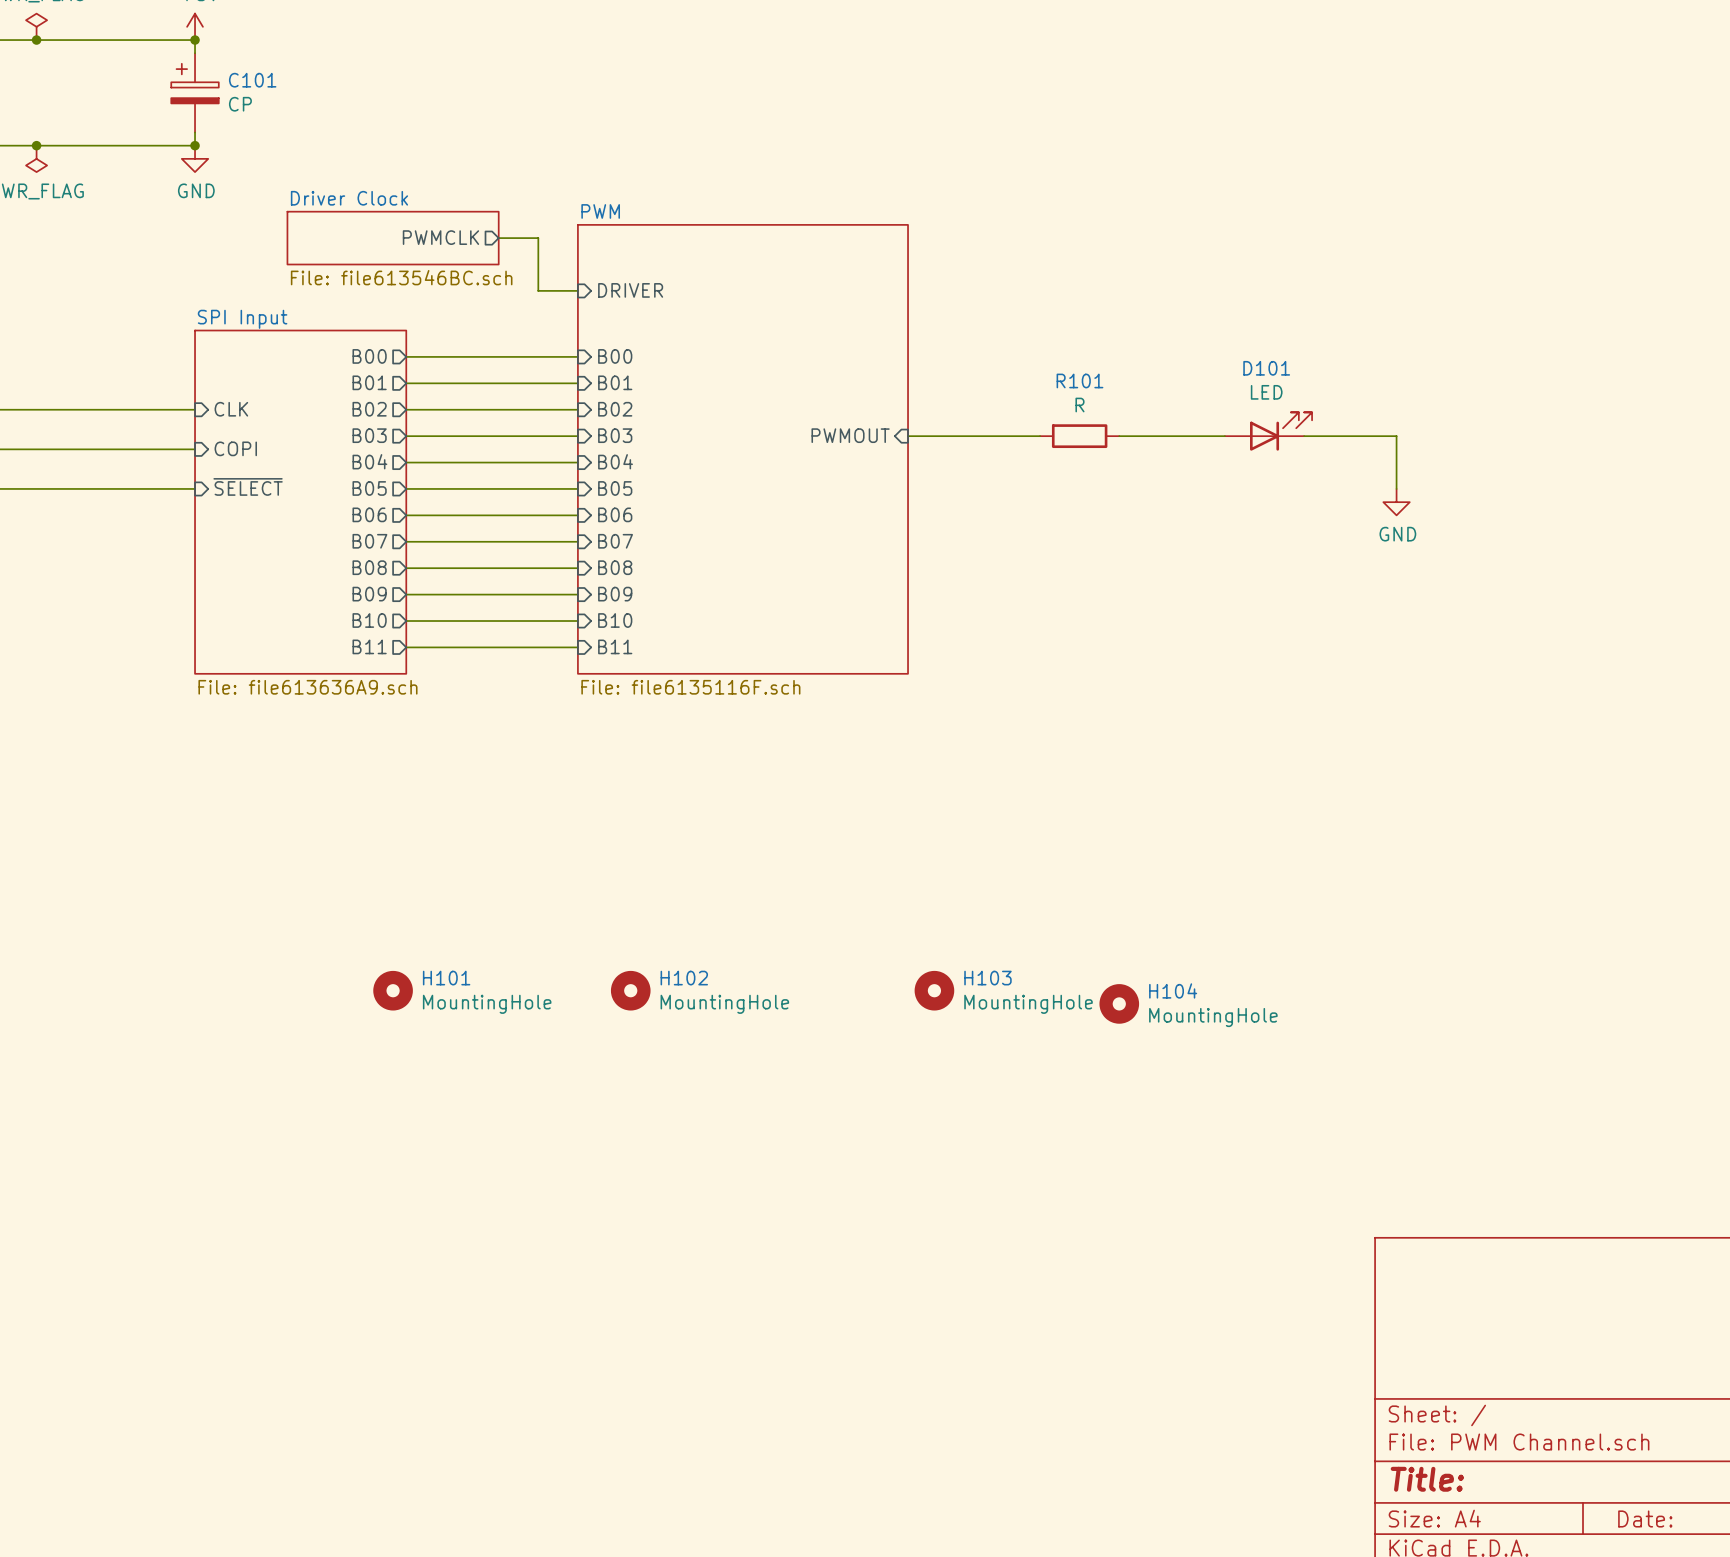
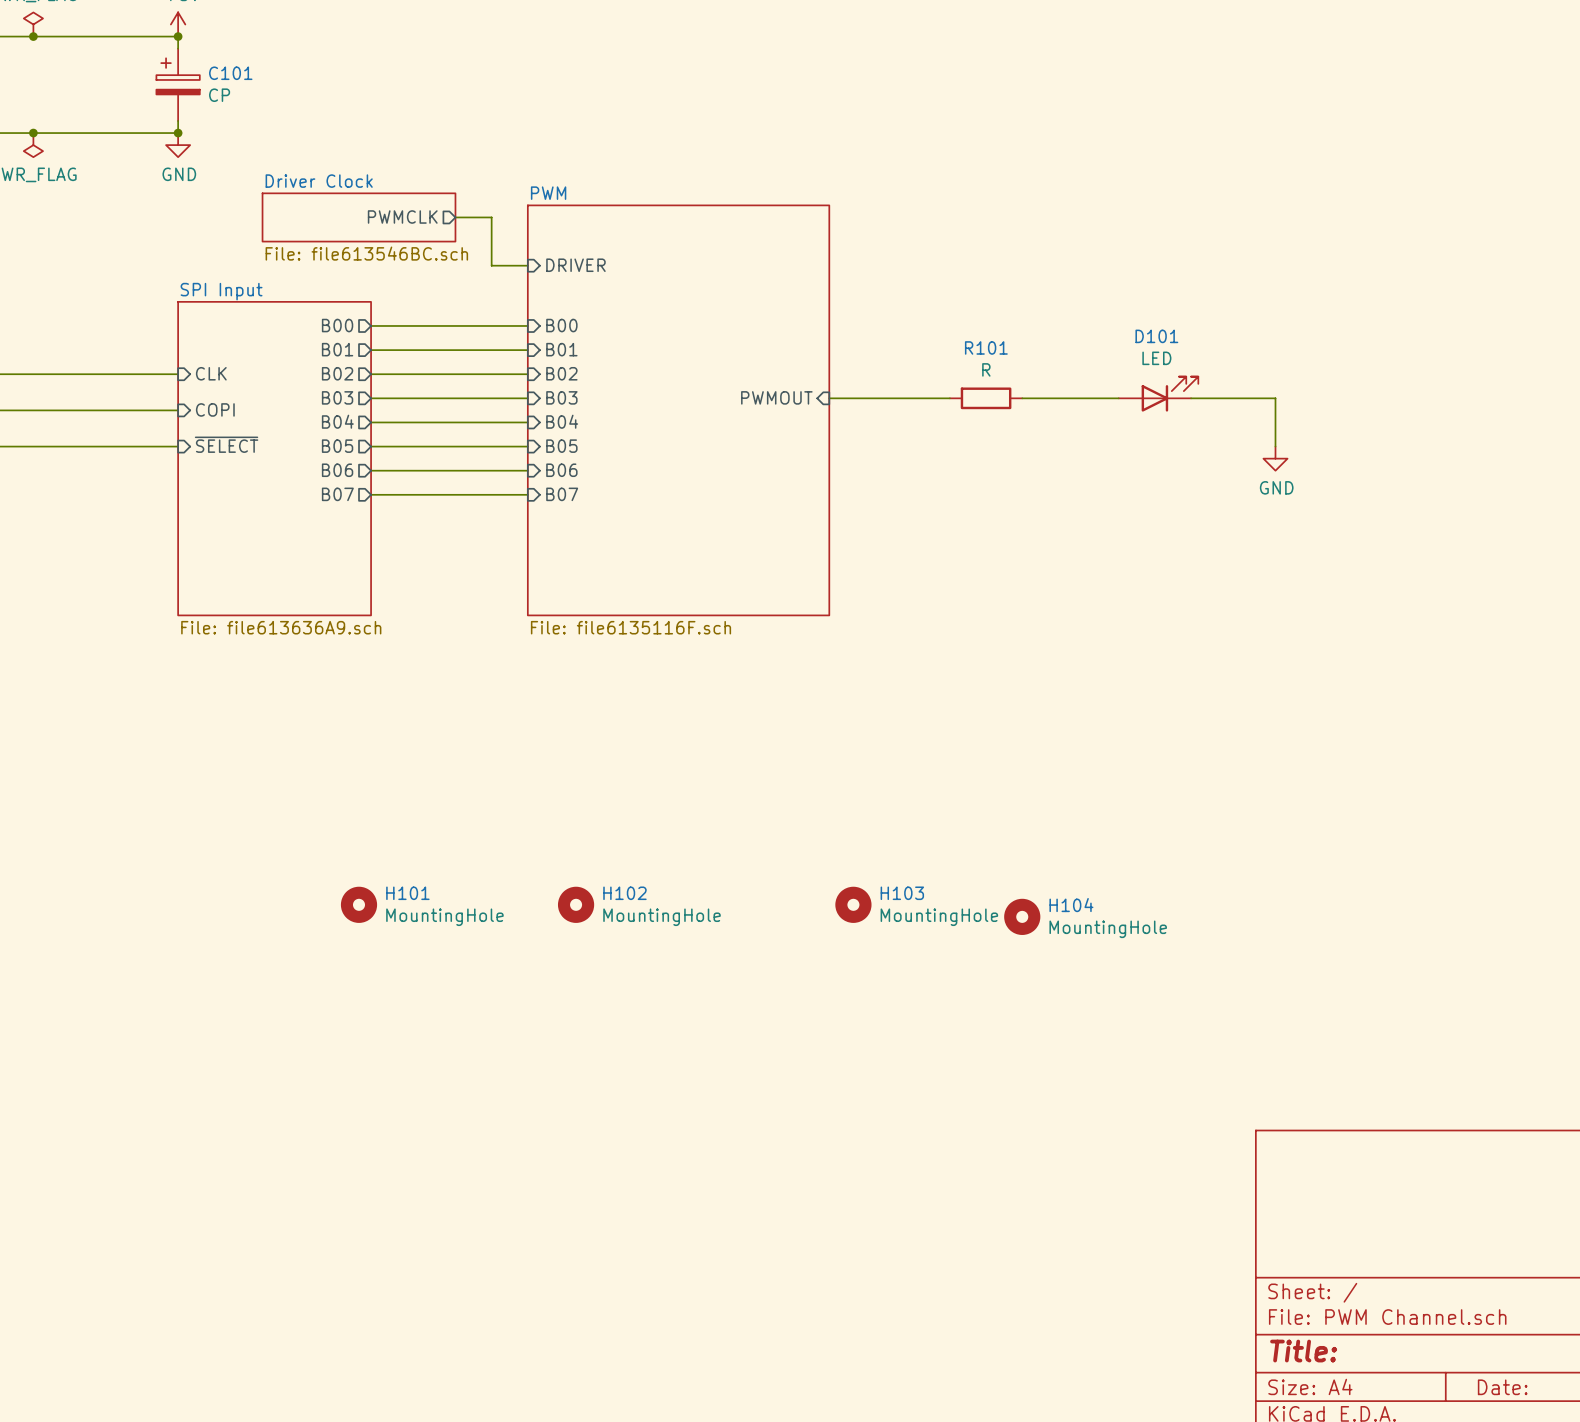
sheet pin: B08 (369, 567) -> none
sheet pin: B08 (615, 567) -> none
wire: (406, 568) (577, 568) -> none
sheet pin: B09 (369, 594) -> none
wire: (406, 594) (577, 594) -> none
sheet pin: B09 (615, 594) -> none
sheet pin: B10 (369, 620) -> none
sheet pin: B10 (615, 620) -> none
wire: (406, 621) (577, 621) -> none
sheet pin: B11 (369, 646) -> none
sheet pin: B11 (615, 646) -> none
wire: (406, 647) (577, 647) -> none

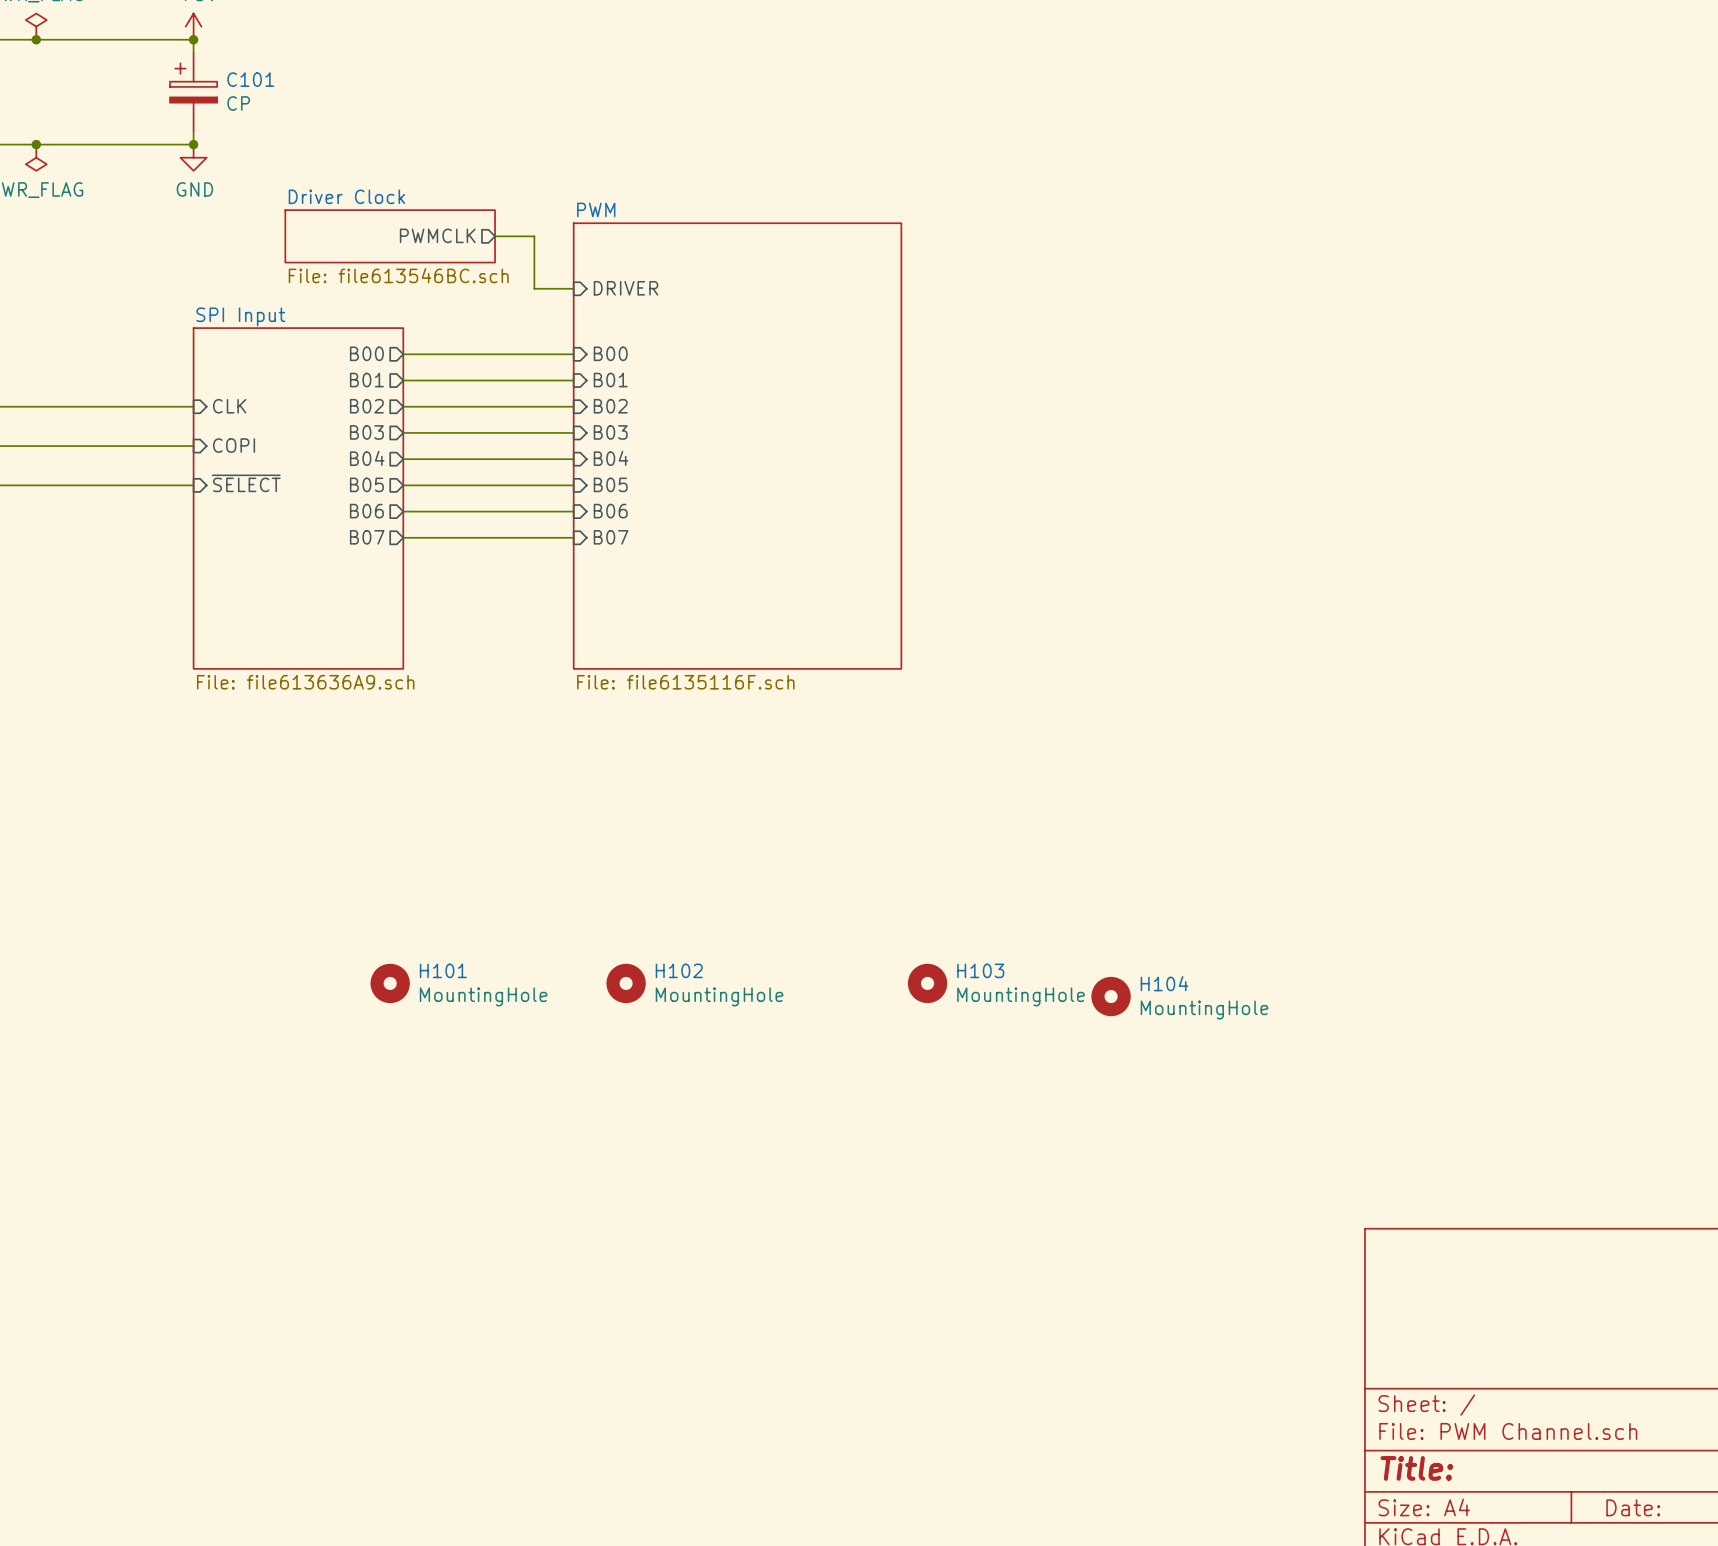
D101: LED (1158, 394) -> none
sheet pin: PWMOUT (776, 397) -> none
wire: (829, 398) (949, 398) -> none
R101: R (986, 398) -> none
wire: (1022, 398) (1118, 398) -> none
wire: (1191, 398) (1275, 398) (1275, 446) -> none
power symbol: GND (1275, 458) -> none

